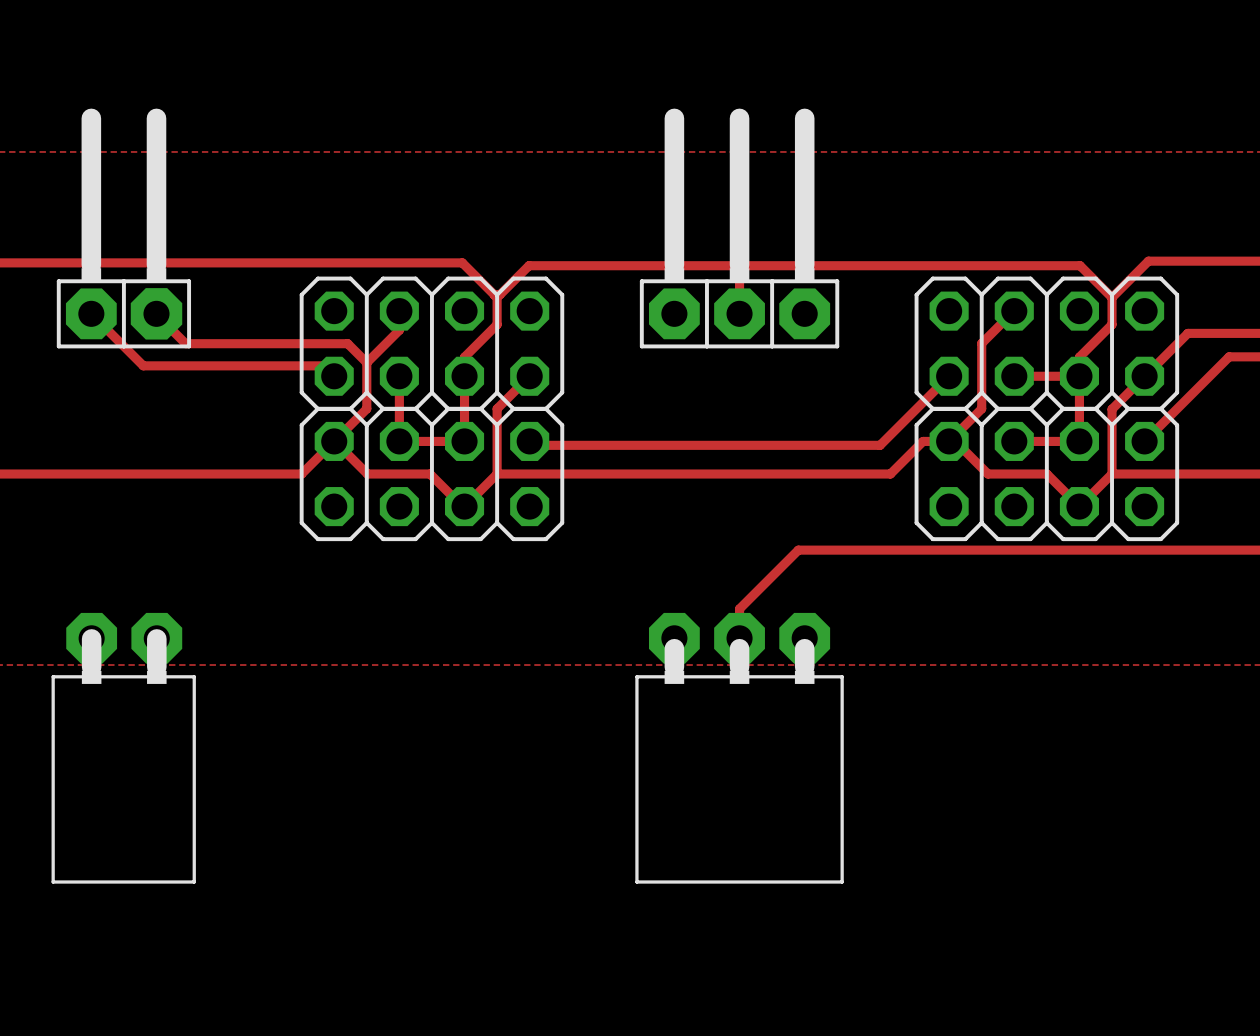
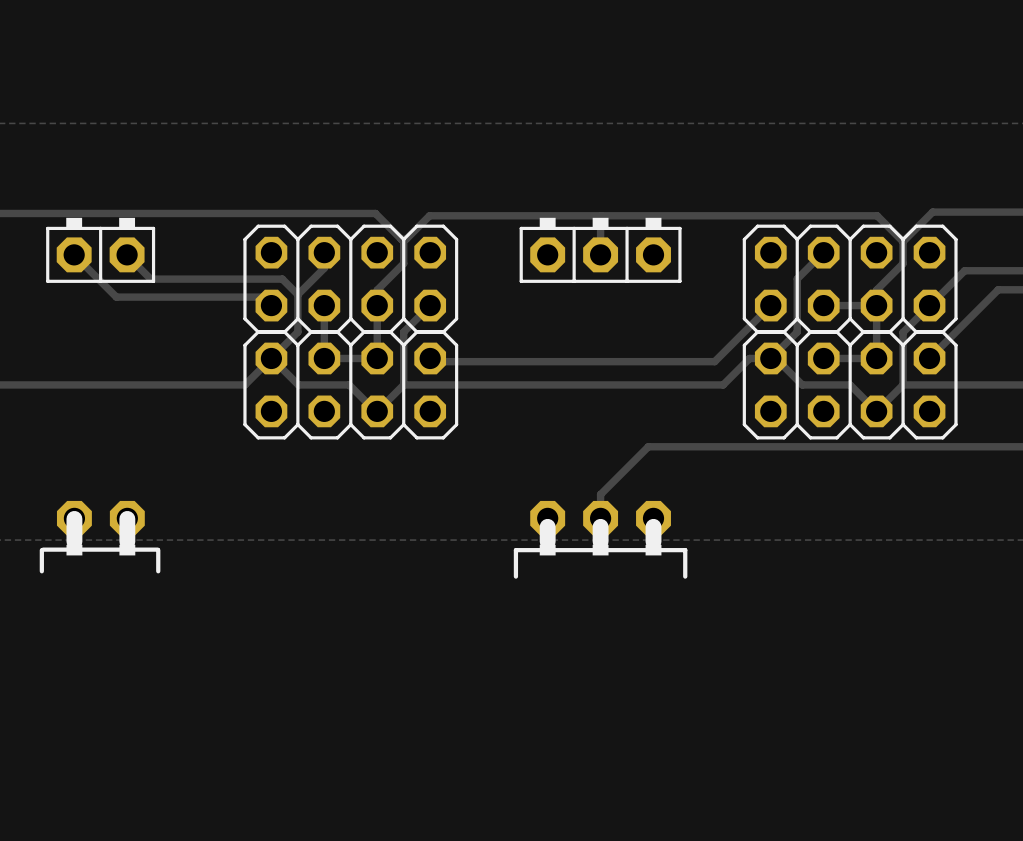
part: (123, 228) -> none
part: (739, 228) -> none
part: none -> (100, 250)
part: none -> (600, 250)
part: none -> (100, 537)
part: none -> (600, 539)
part: (123, 748) -> none
part: (739, 748) -> none

